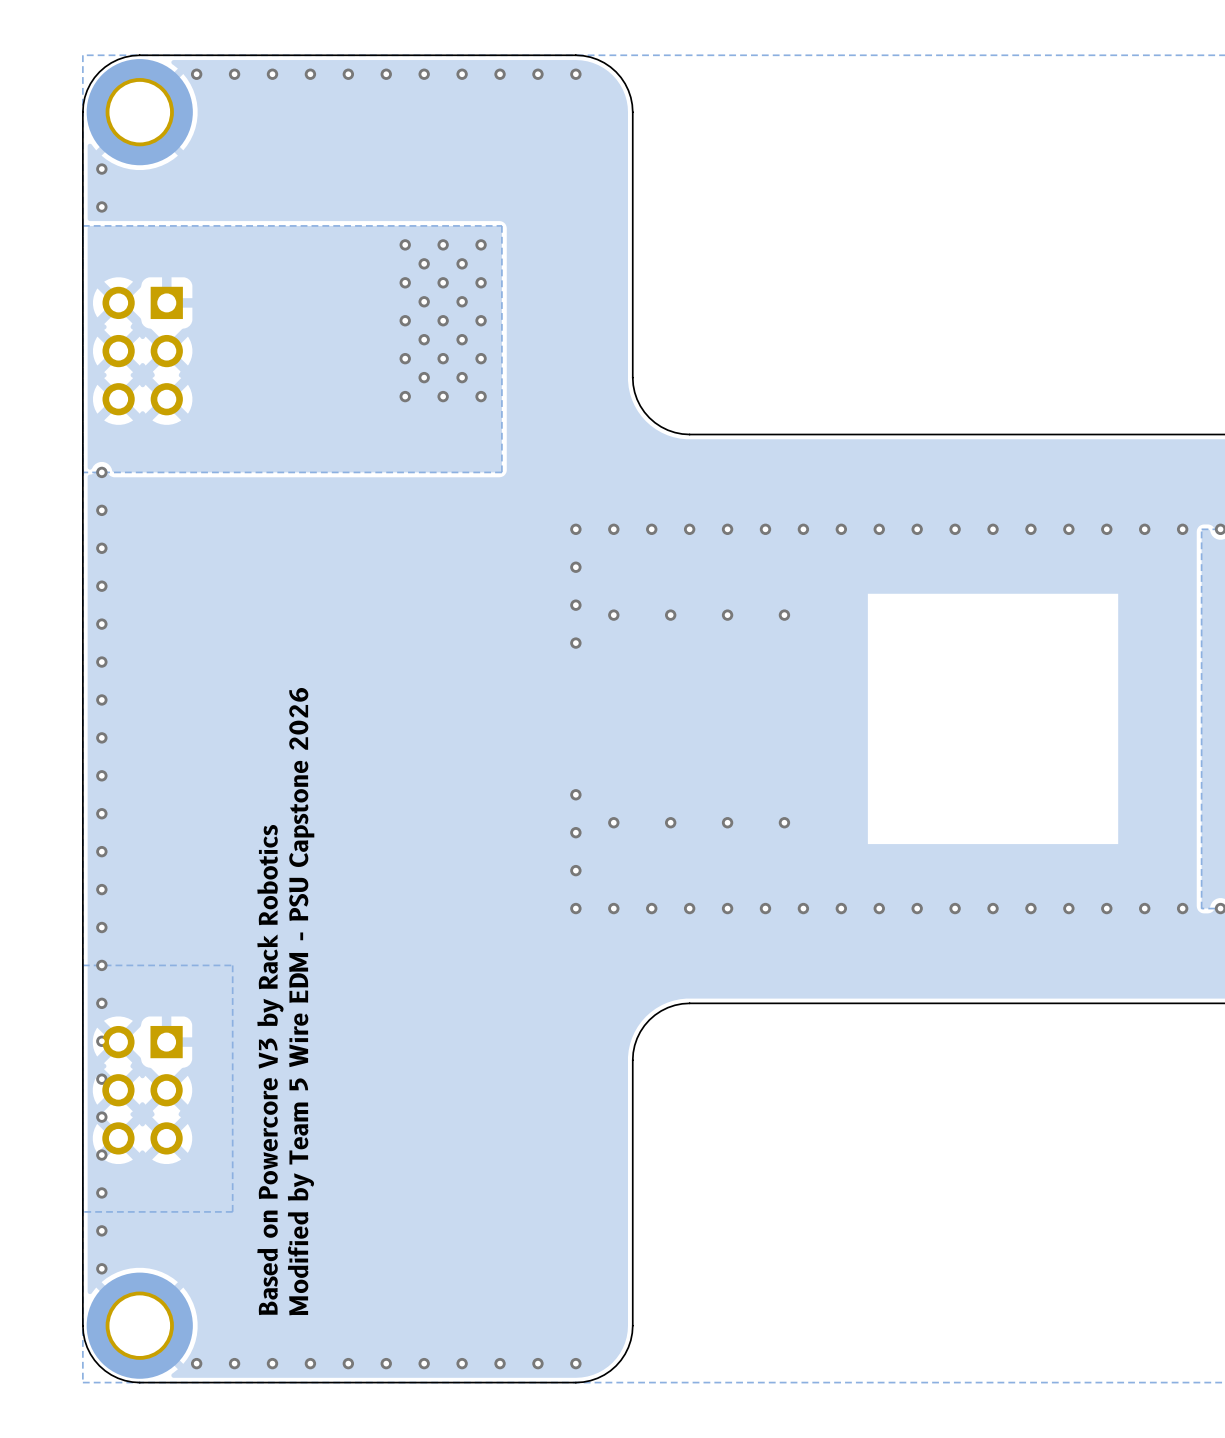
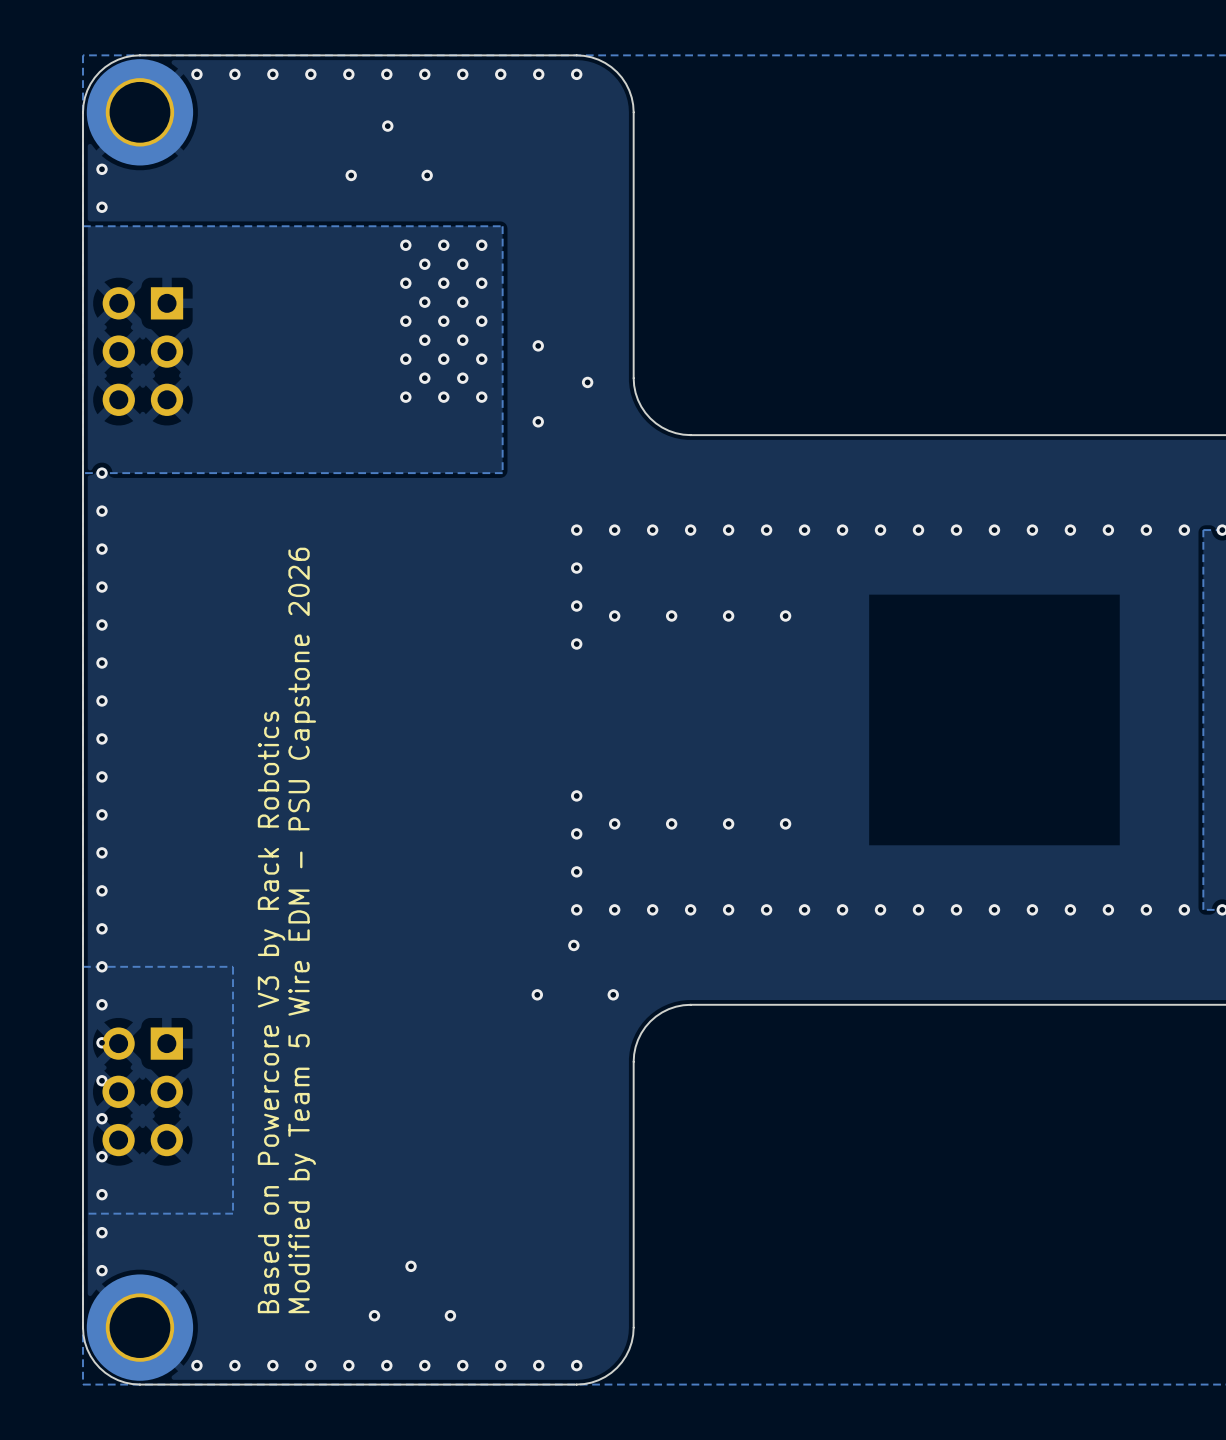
via: none -> (387, 126)
via: none -> (351, 175)
via: none -> (427, 175)
via: none -> (538, 345)
via: none -> (587, 382)
via: none -> (538, 421)
via: none -> (573, 945)
via: none -> (537, 994)
via: none -> (613, 994)
via: none -> (411, 1266)
via: none -> (374, 1315)
via: none -> (450, 1315)

